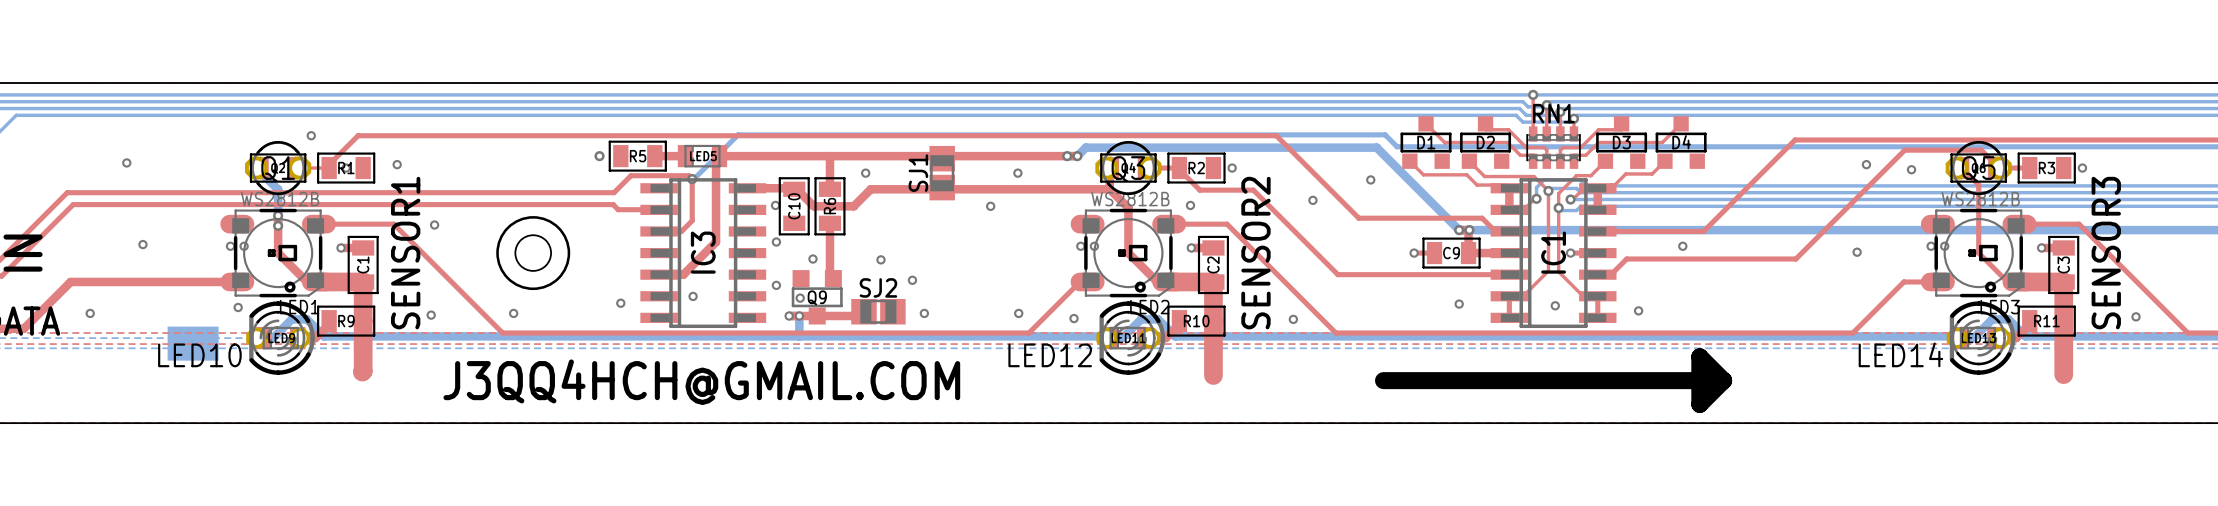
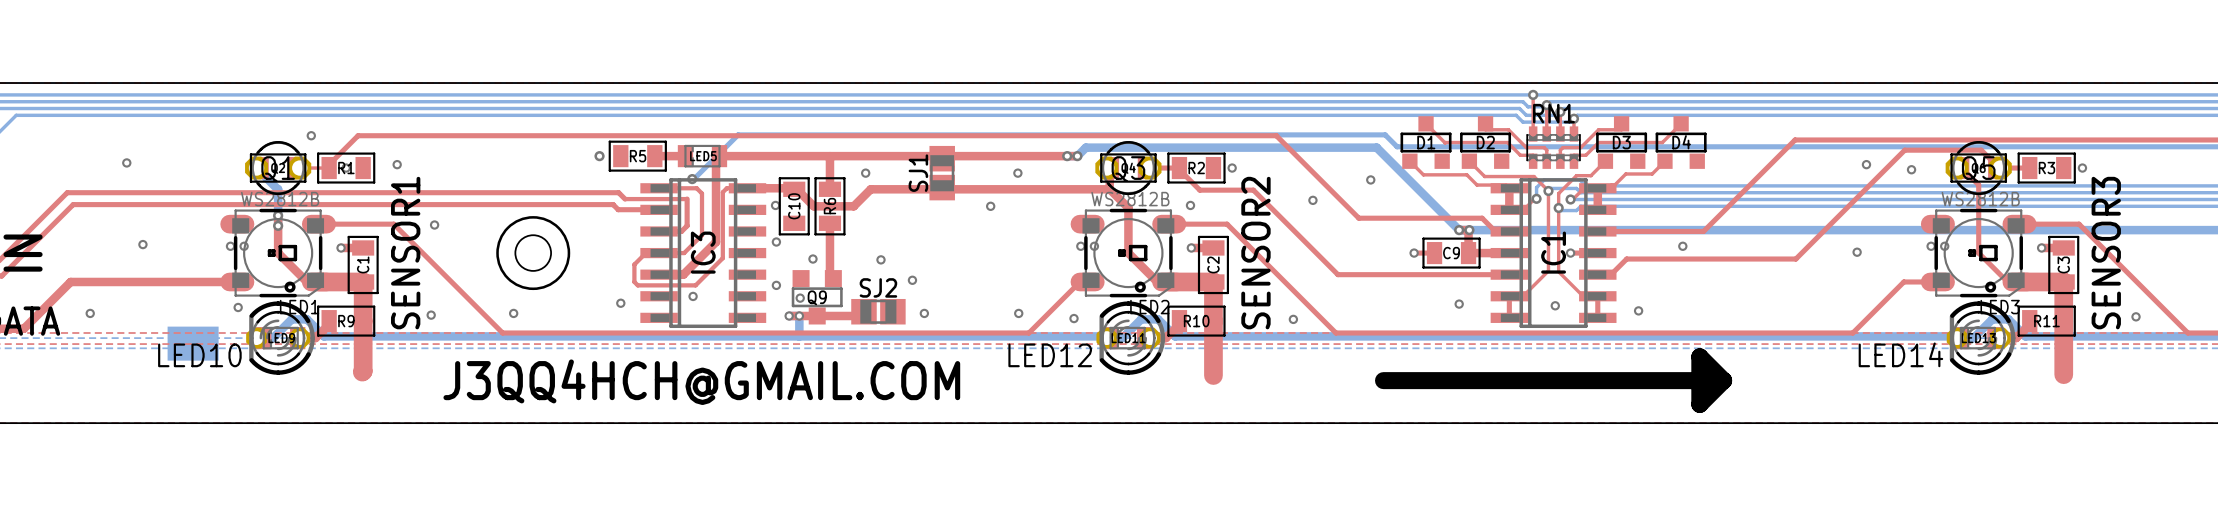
top track: none -> (659, 188) (696, 188) (702, 193) (702, 235) (684, 253) (645, 253) (634, 264) (634, 281) (637, 285) (695, 285) (722, 258) (722, 192) (726, 188) (747, 188)
top track: (614, 192) (631, 175) (688, 175) (692, 179) (692, 220) (687, 225) -> (614, 192) (618, 192) (625, 199) (687, 199) (687, 225)

